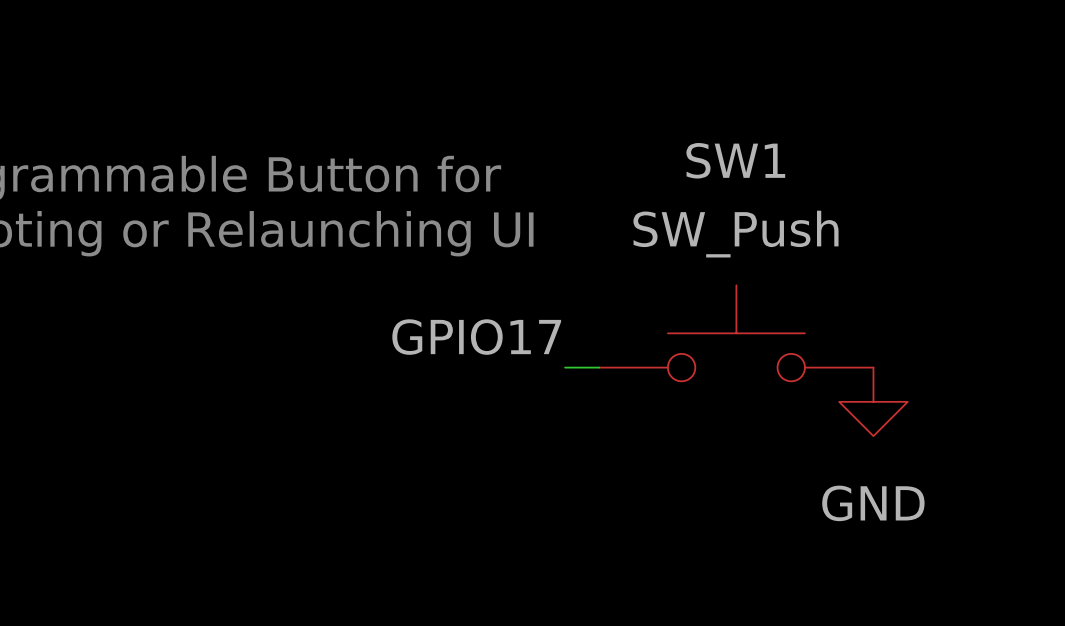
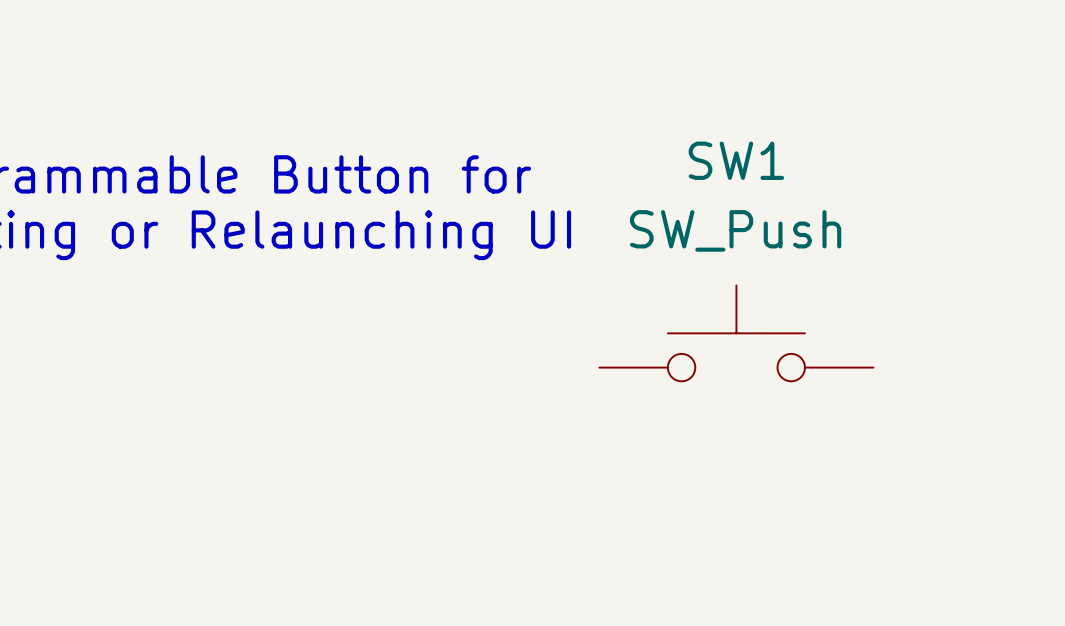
label: GPIO17 (476, 337) -> none
wire: (565, 367) (599, 367) -> none
power symbol: GND (873, 401) -> none

